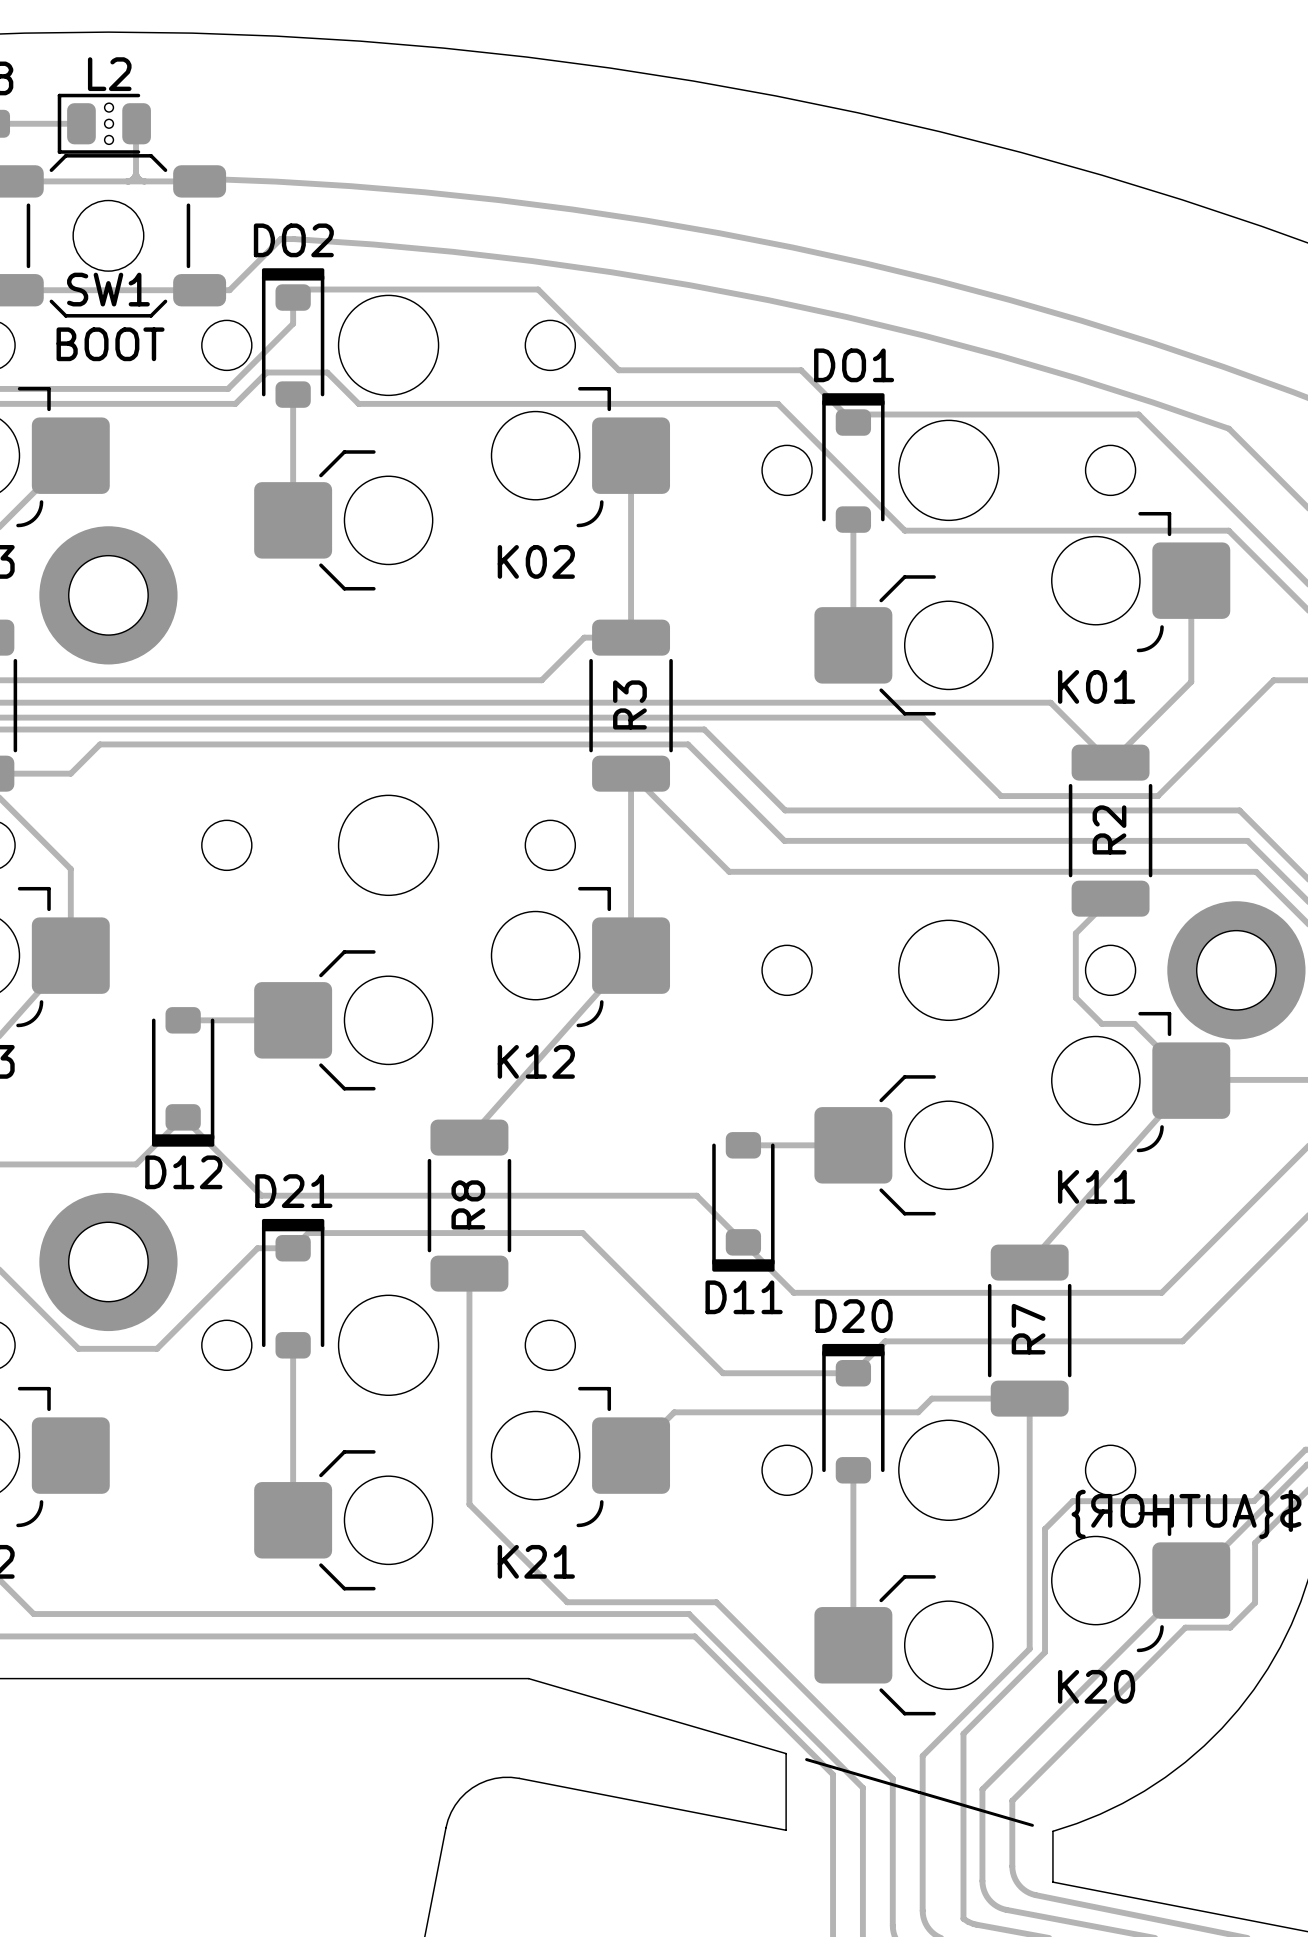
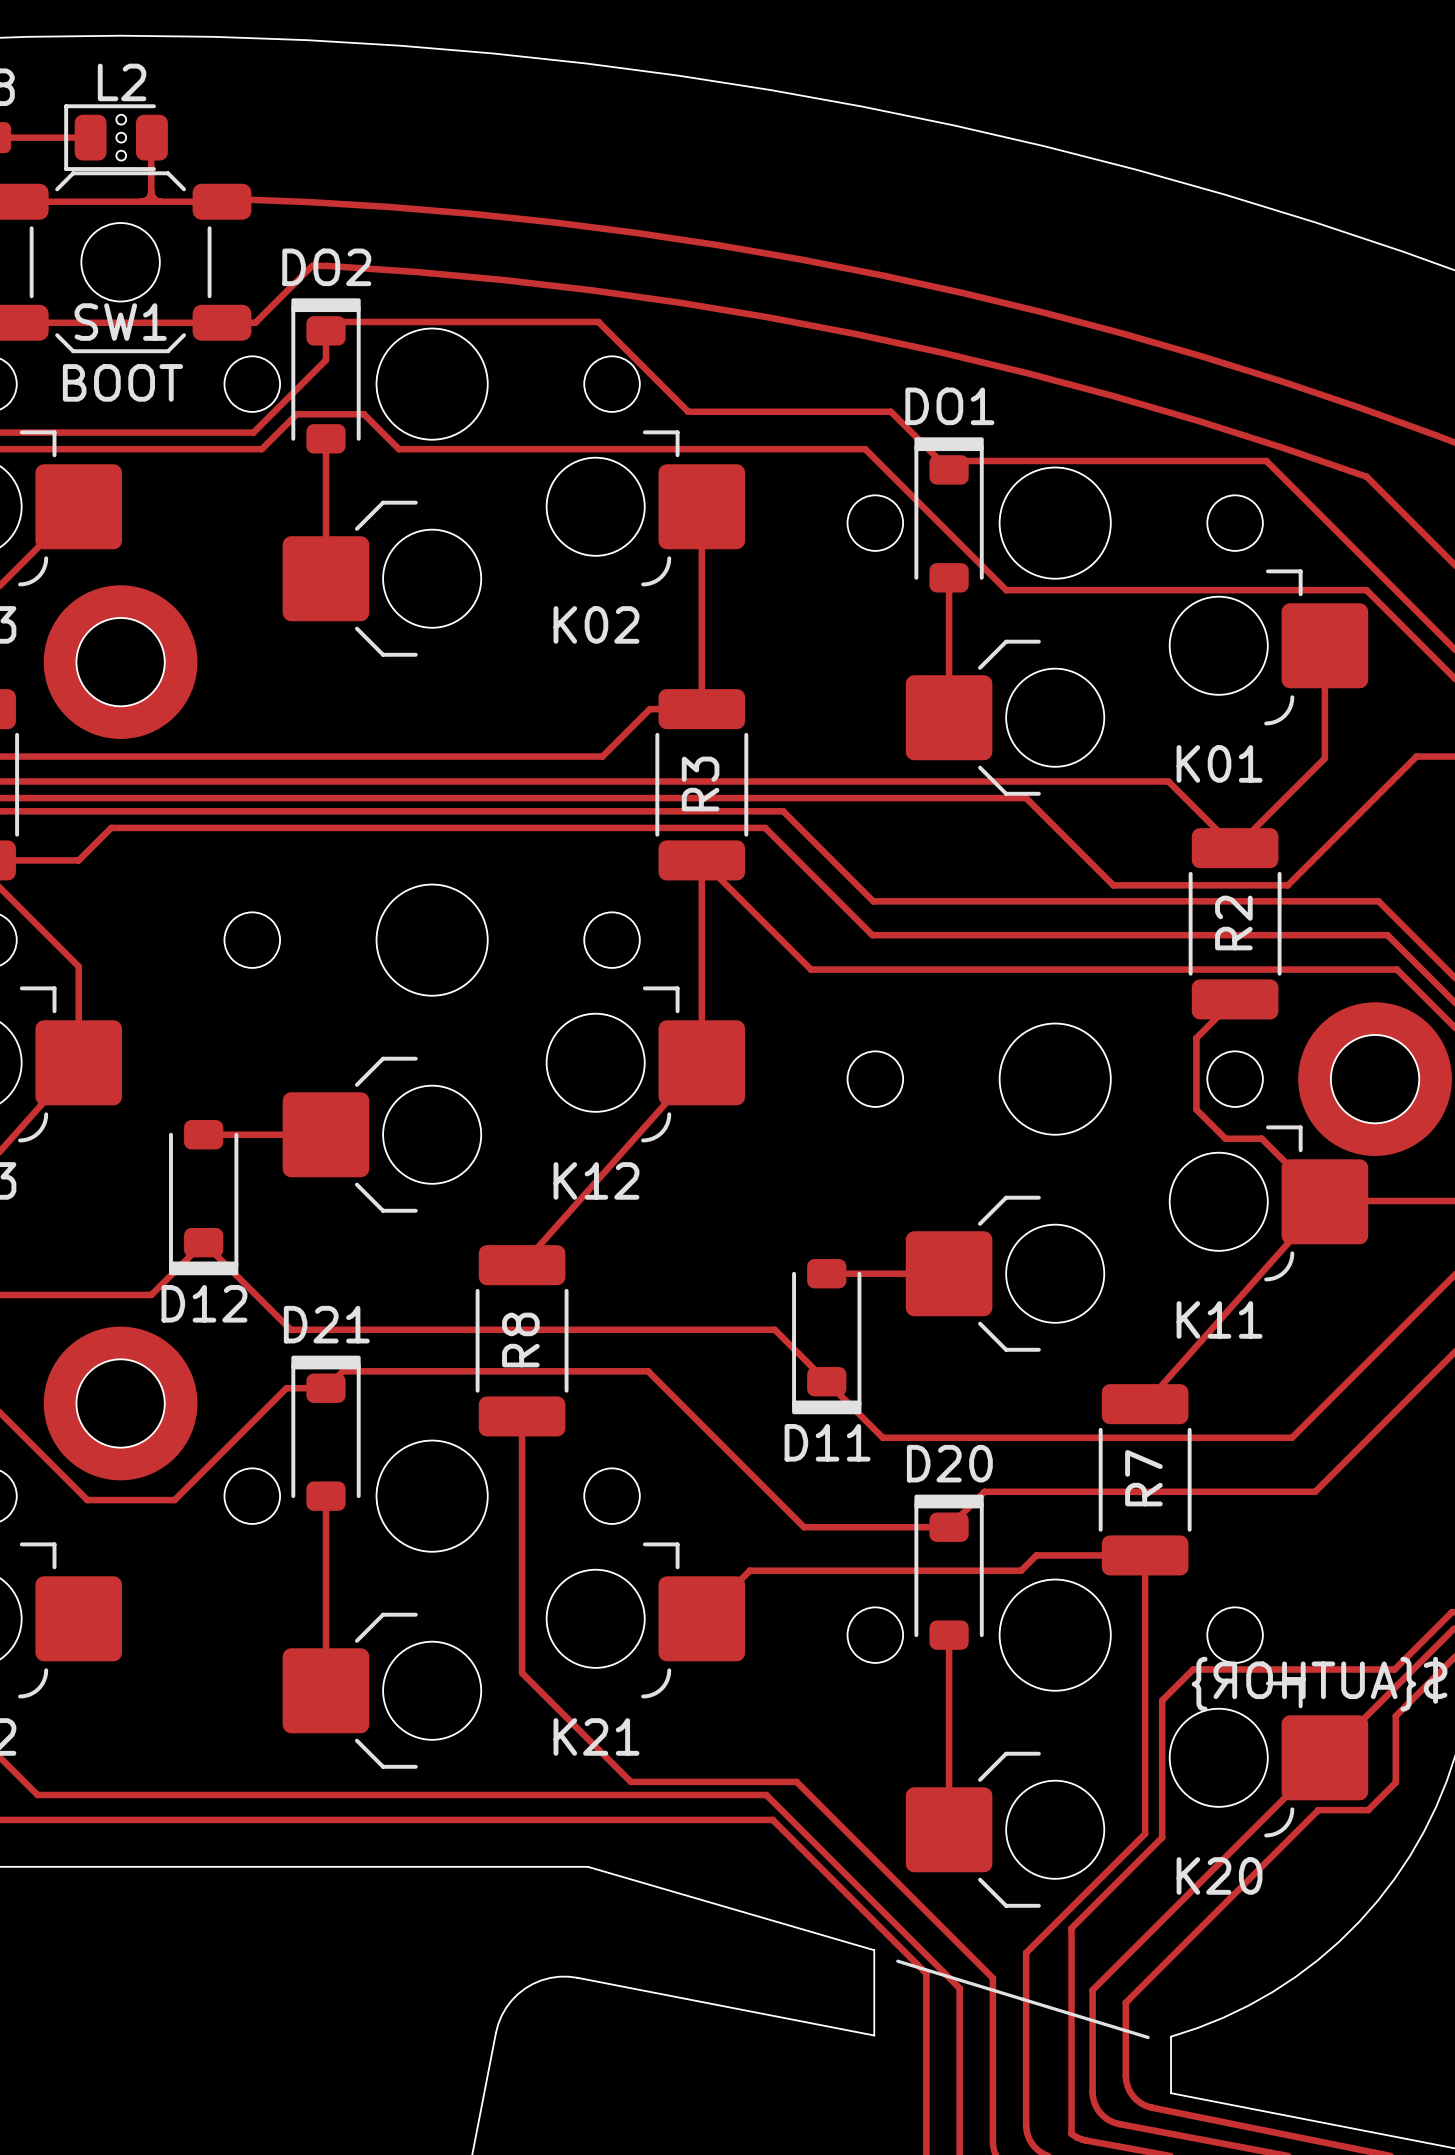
line: (806, 1759) (1032, 1825) -> none
line: none -> (897, 1961) (1148, 2037)

